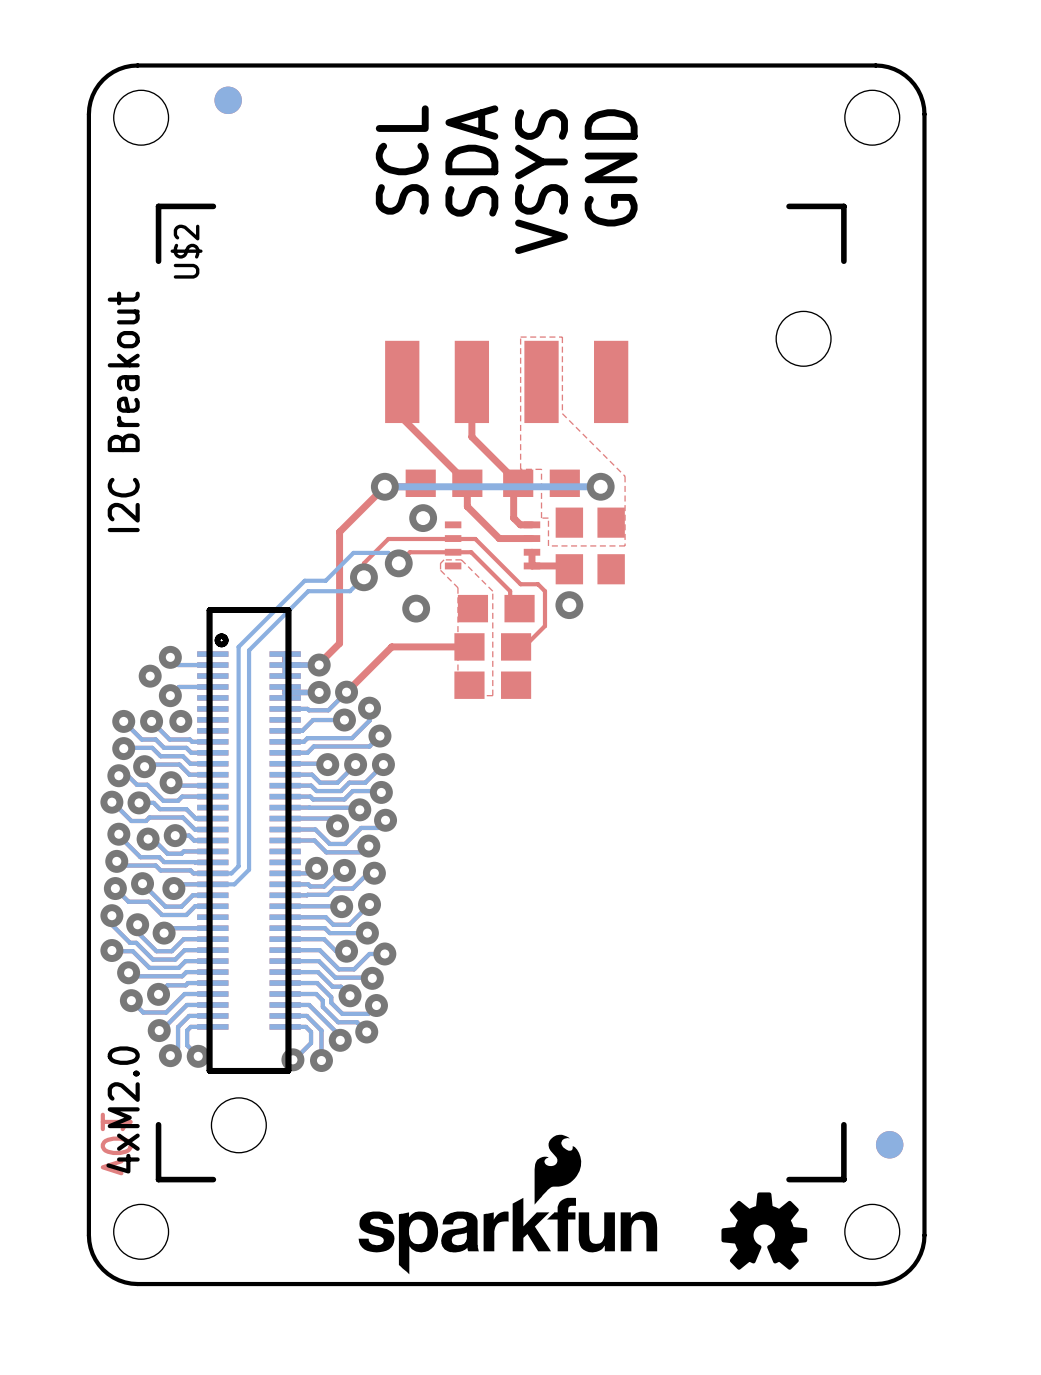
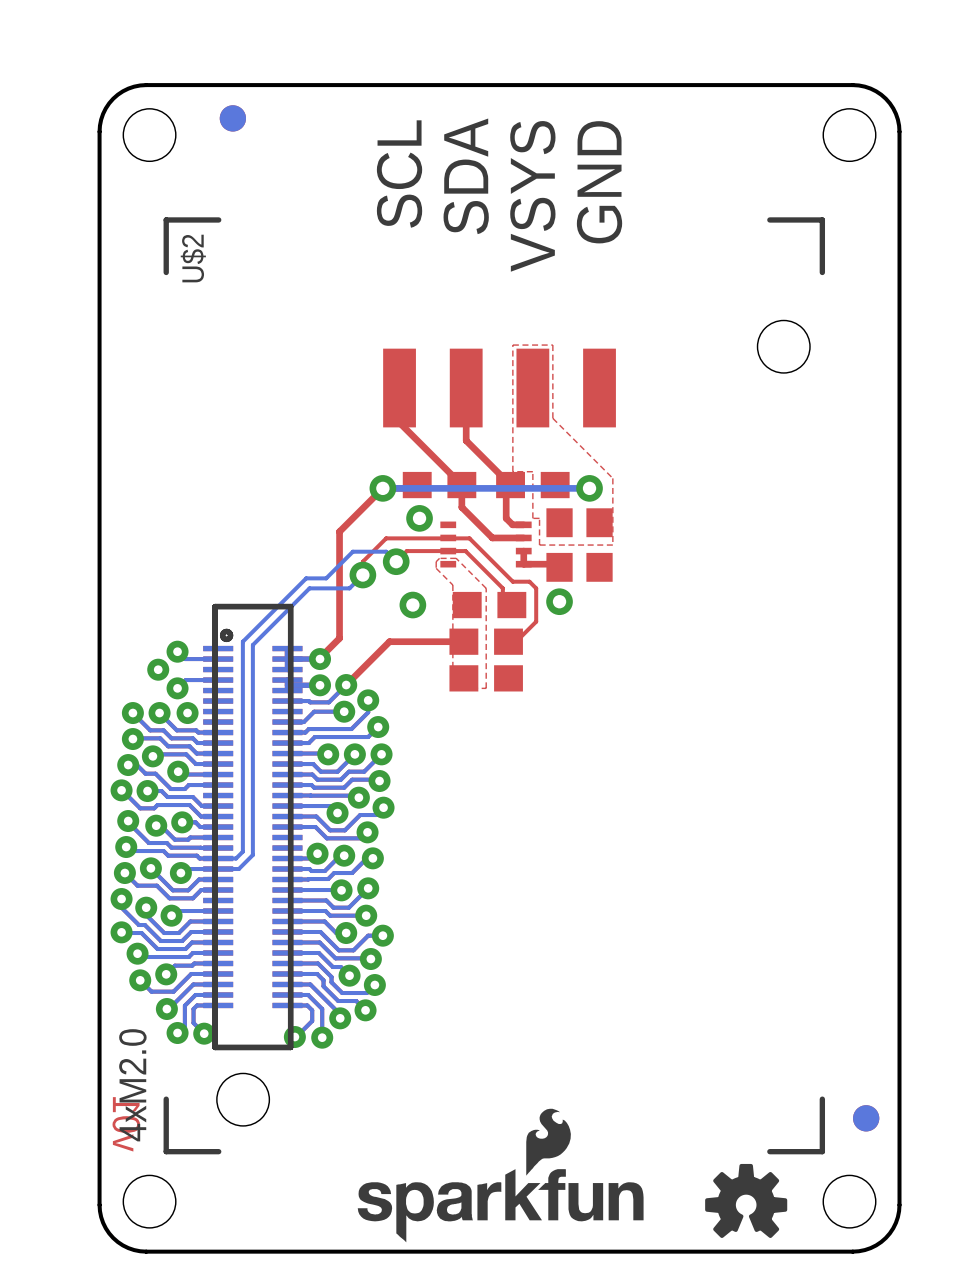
text: I2C Breakout (123, 411) -> none

